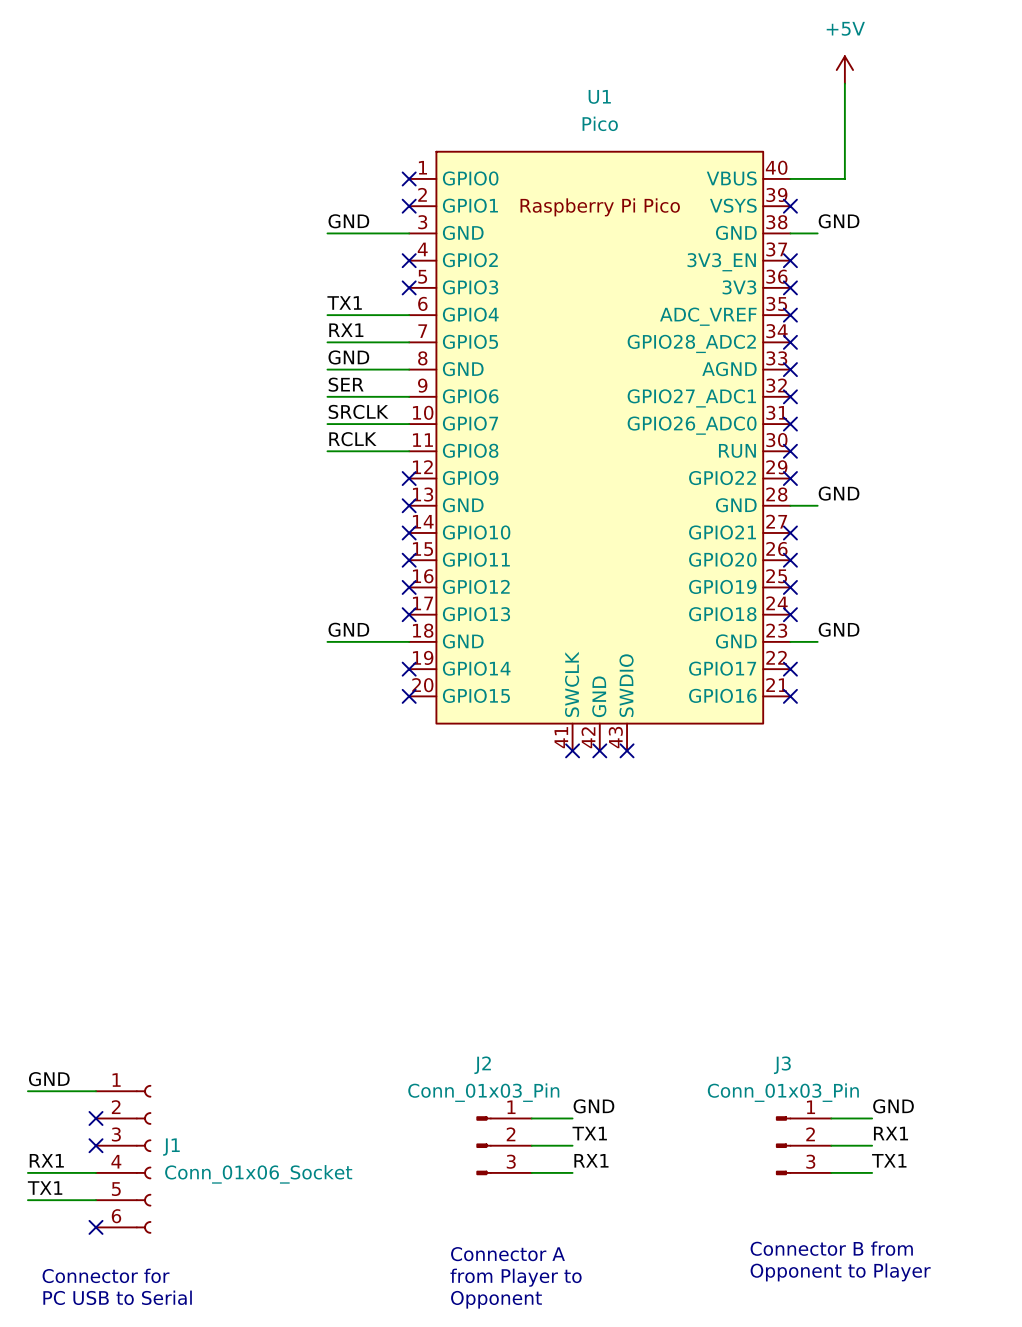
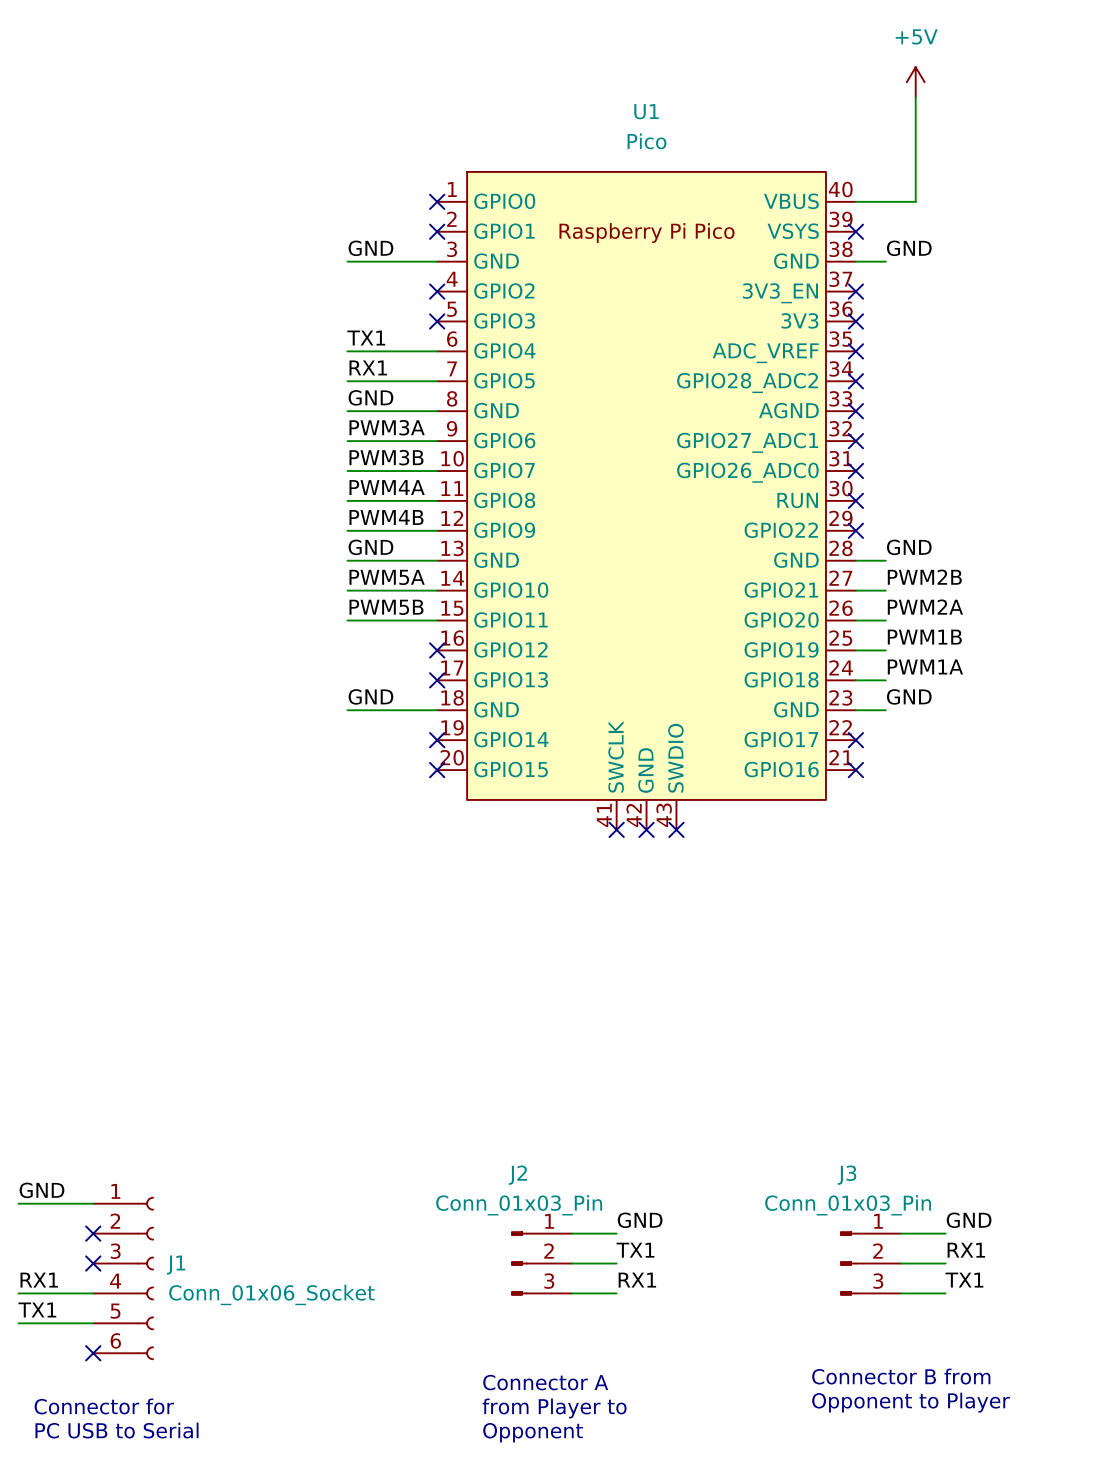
label: SER (346, 384) -> PWM3A (387, 427)
label: SRCLK (358, 411) -> PWM3B (386, 457)
label: RCLK (352, 439) -> PWM4A (387, 487)
label: none -> PWM4B (386, 517)
wire: none -> (347, 530) (437, 530)
no-connect mark: (409, 478) -> none
label: none -> GND (370, 547)
wire: none -> (347, 560) (437, 560)
no-connect mark: (409, 505) -> none
label: none -> PWM5A (387, 577)
label: none -> PWM2B (924, 577)
wire: none -> (347, 590) (437, 590)
no-connect mark: (409, 532) -> none
wire: none -> (855, 590) (885, 590)
no-connect mark: (790, 532) -> none
label: none -> PWM2A (925, 607)
label: none -> PWM5B (386, 607)
wire: none -> (347, 620) (437, 620)
no-connect mark: (409, 560) -> none
wire: none -> (855, 620) (885, 620)
no-connect mark: (790, 560) -> none
label: none -> PWM1B (924, 637)
wire: none -> (855, 650) (885, 650)
no-connect mark: (790, 587) -> none
label: none -> PWM1A (925, 667)
wire: none -> (855, 680) (885, 680)
no-connect mark: (790, 614) -> none

